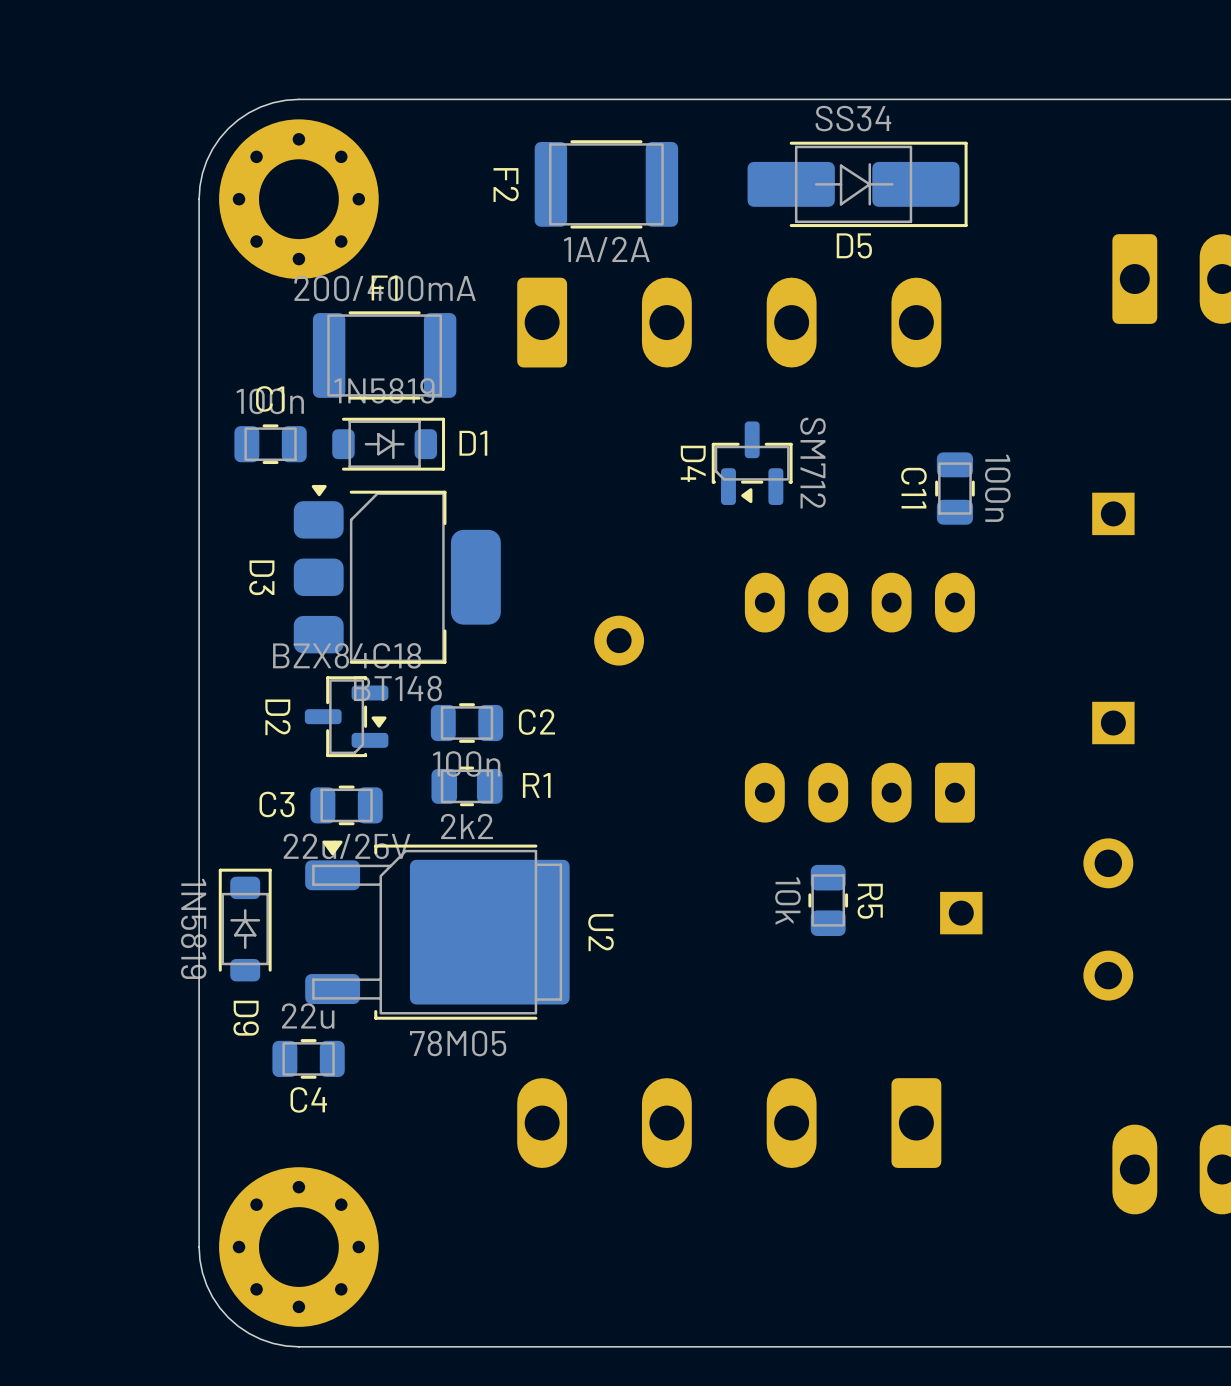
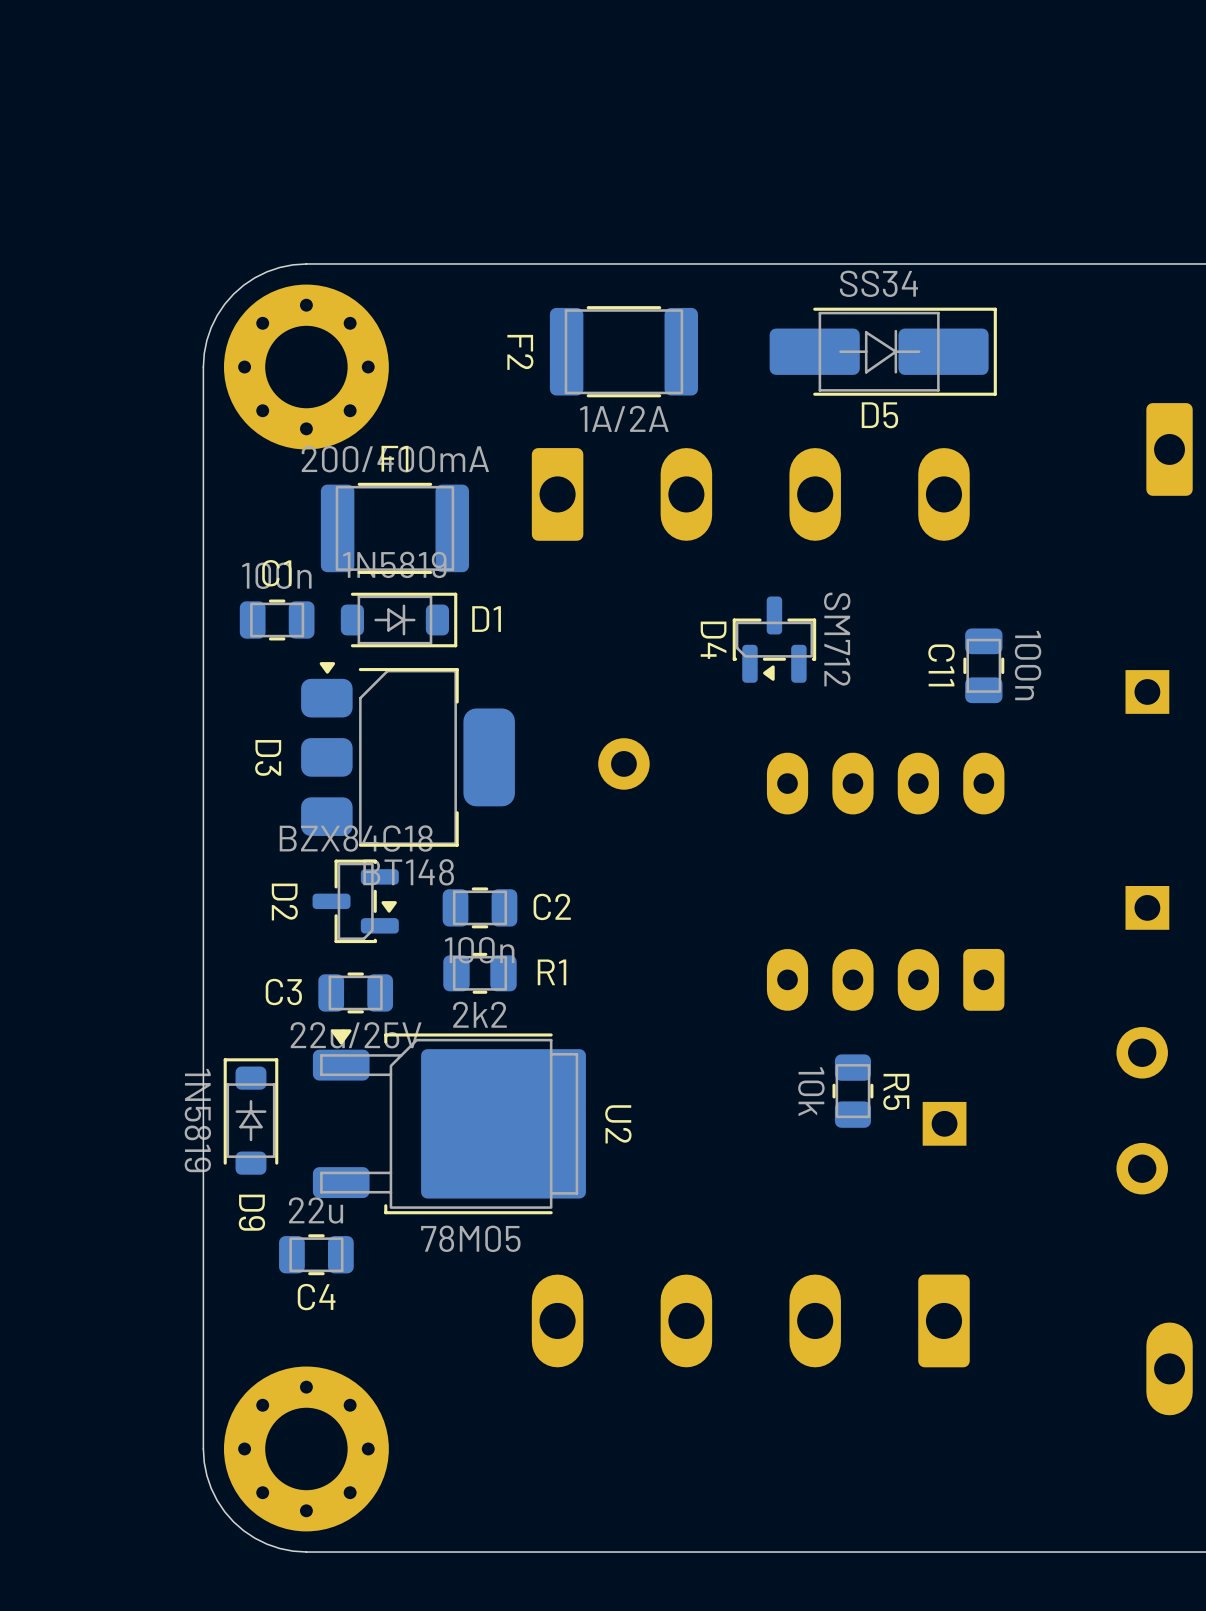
part position: (619, 640) -> (623, 763)
part position: (961, 913) -> (944, 1123)

